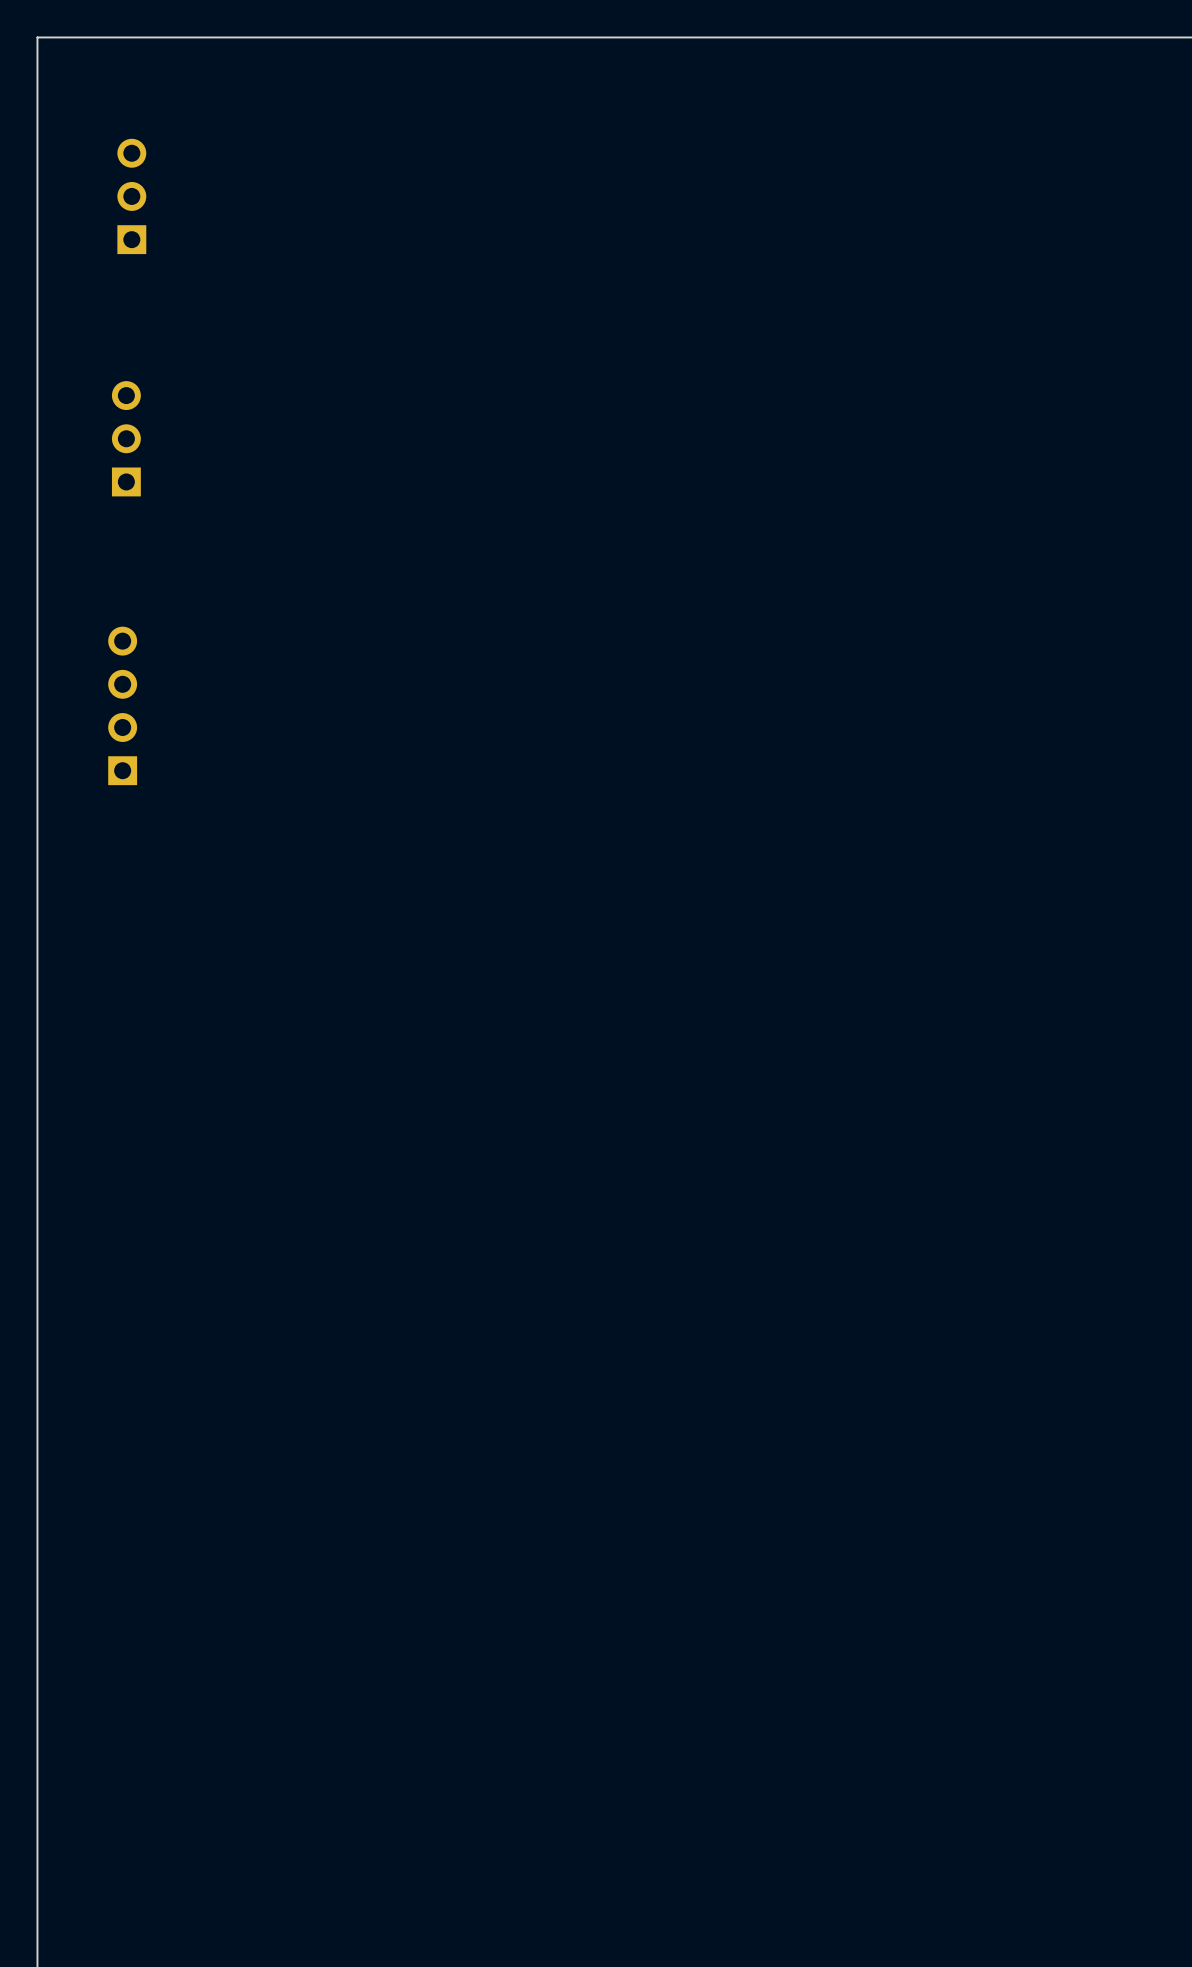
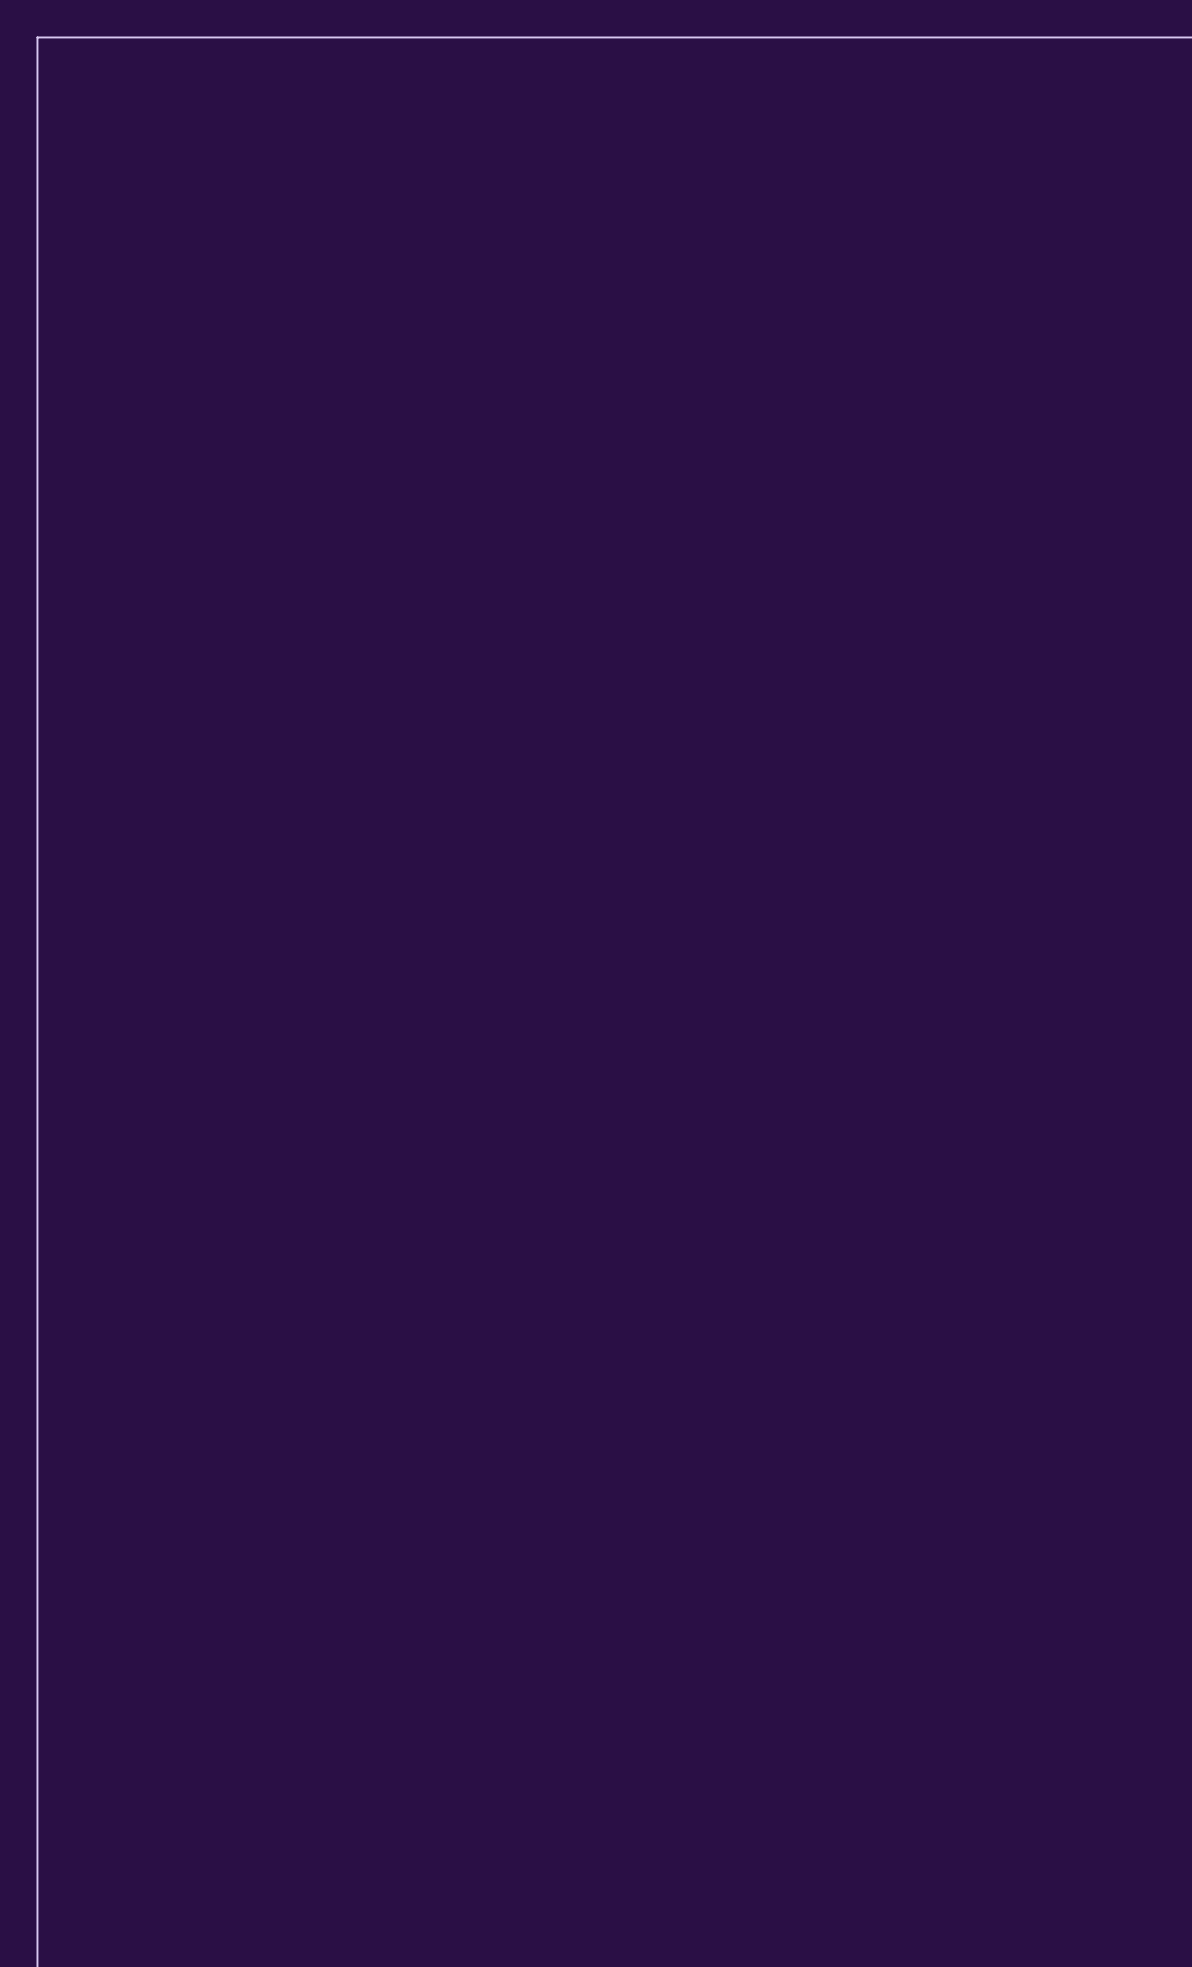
part: (131, 196) -> none
part: (126, 438) -> none
part: (122, 705) -> none

